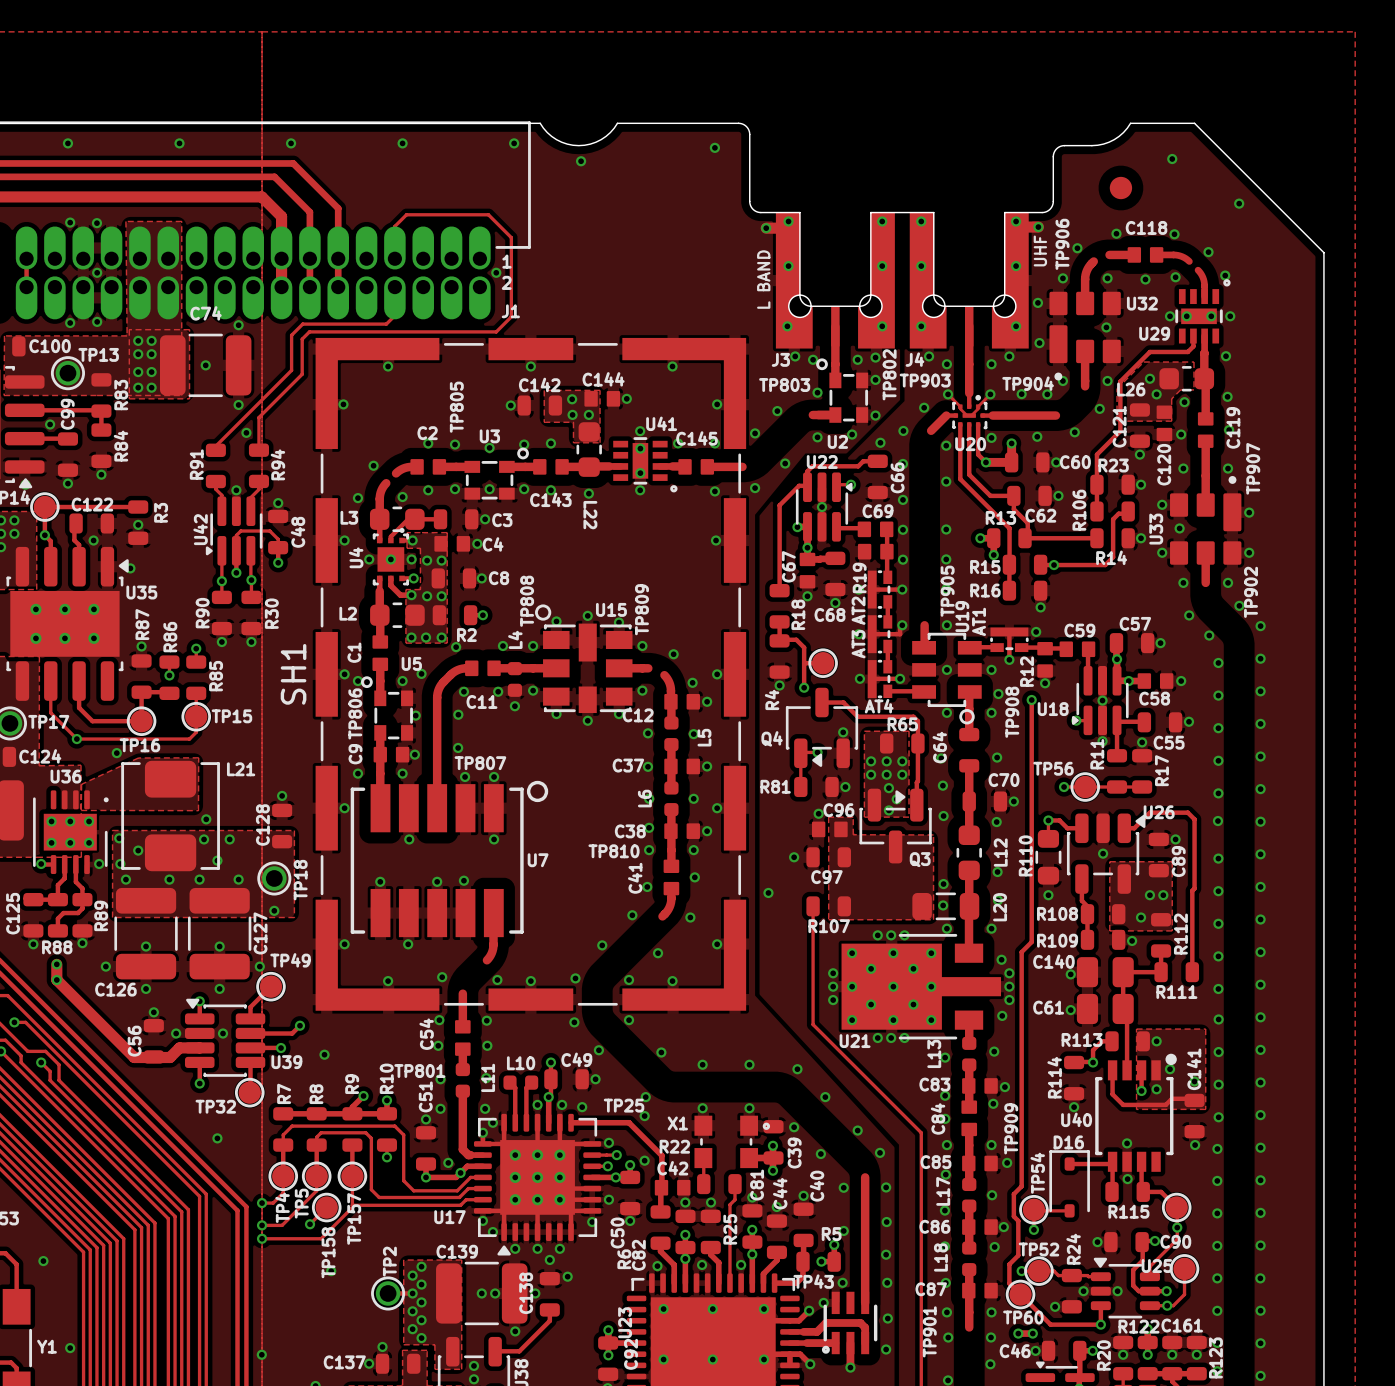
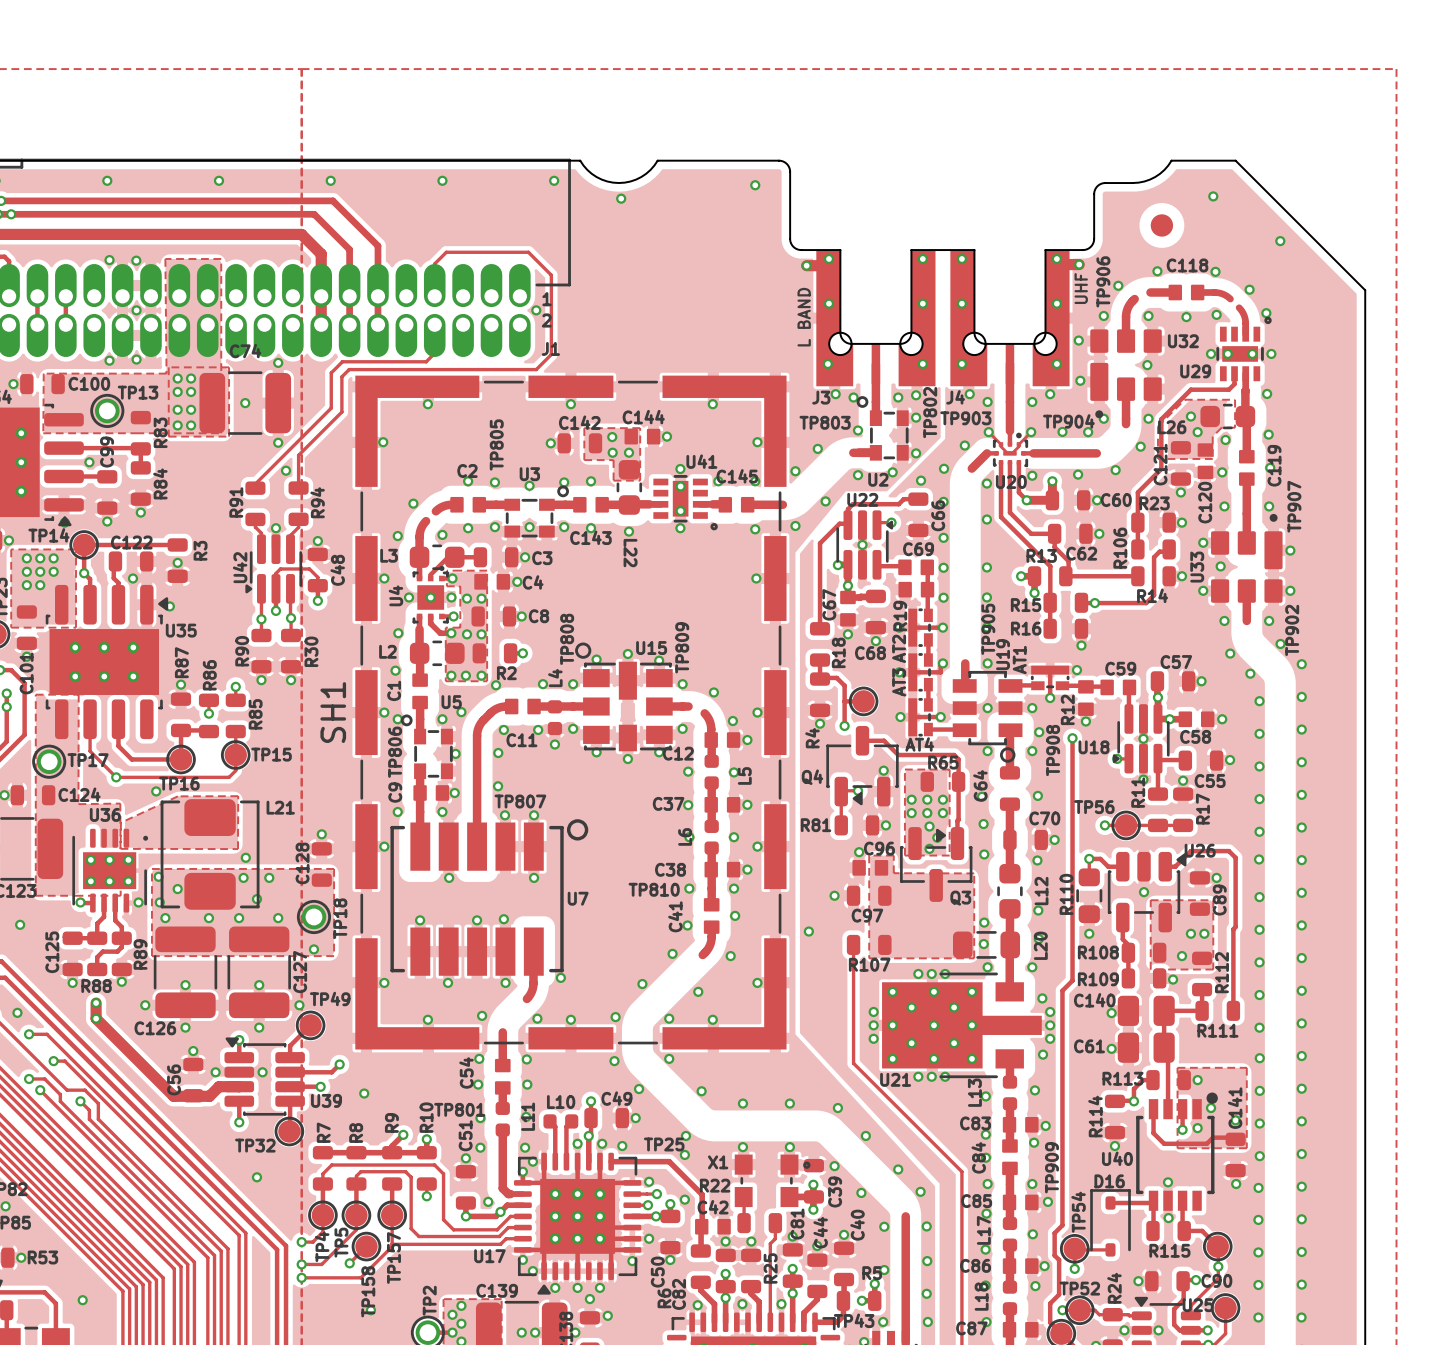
via: none -> (398, 633)
via: none -> (395, 670)
via: (649, 827) -> none
via: none -> (560, 977)
via: none -> (505, 982)

